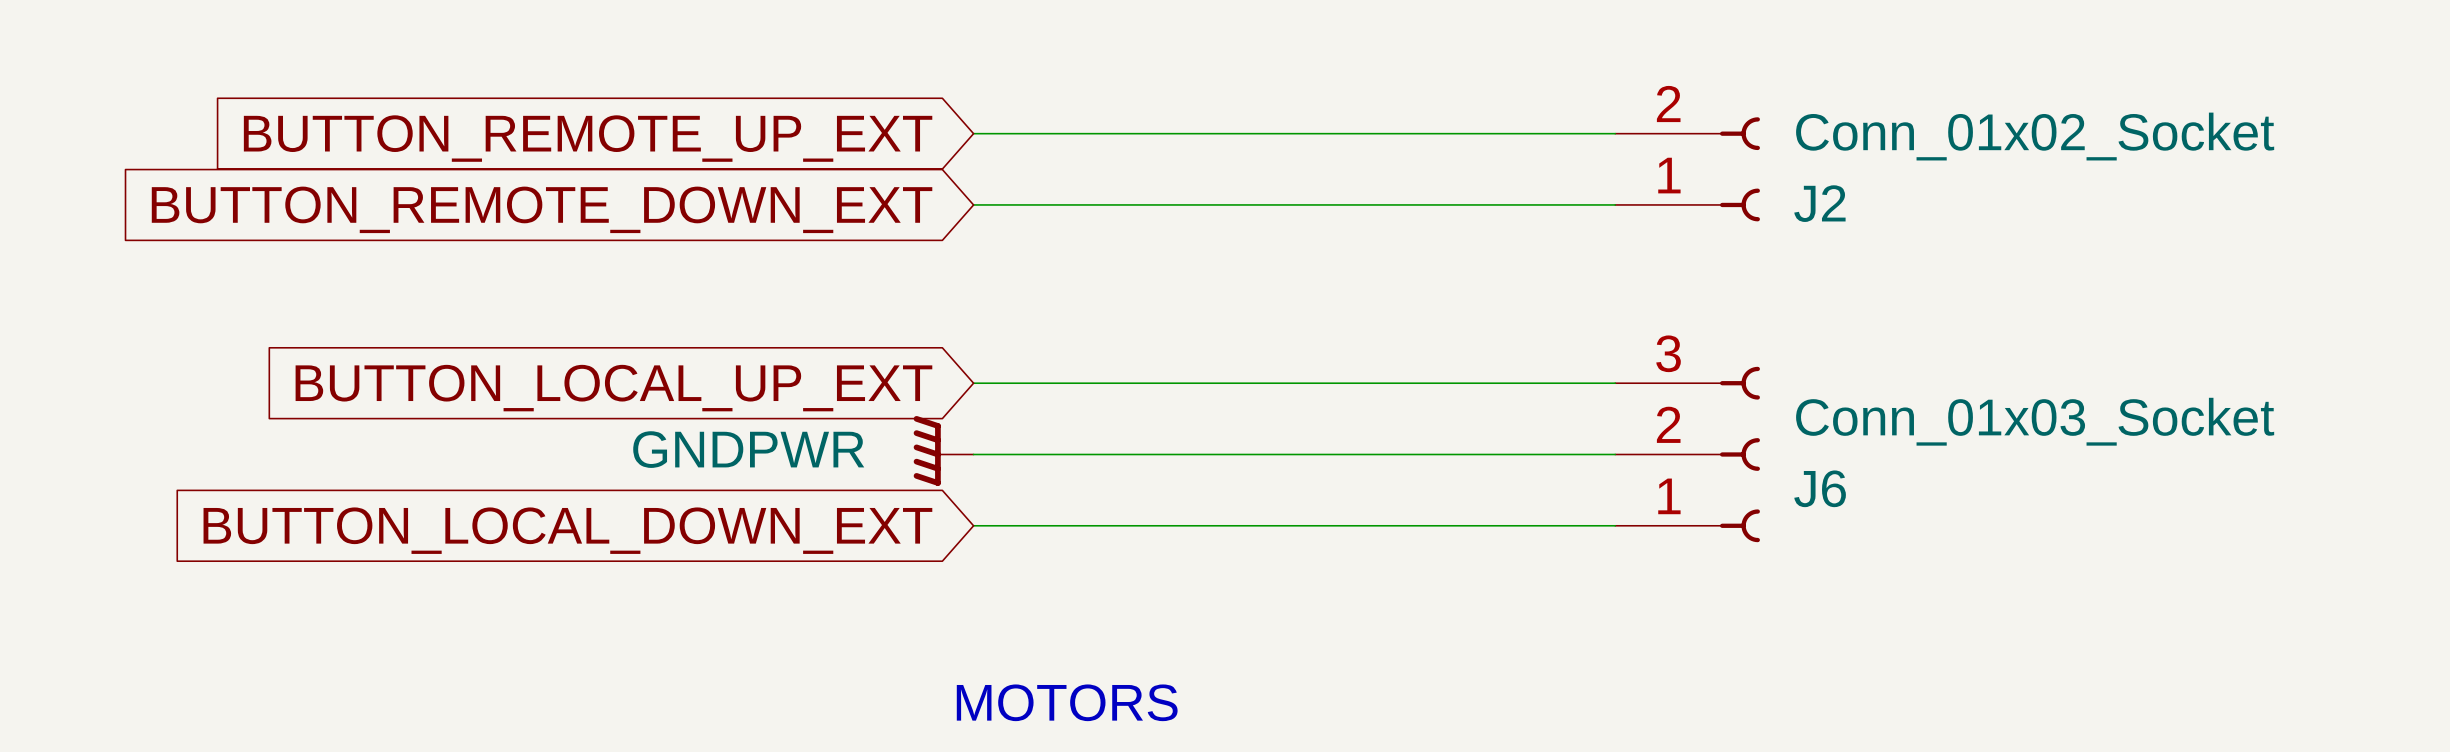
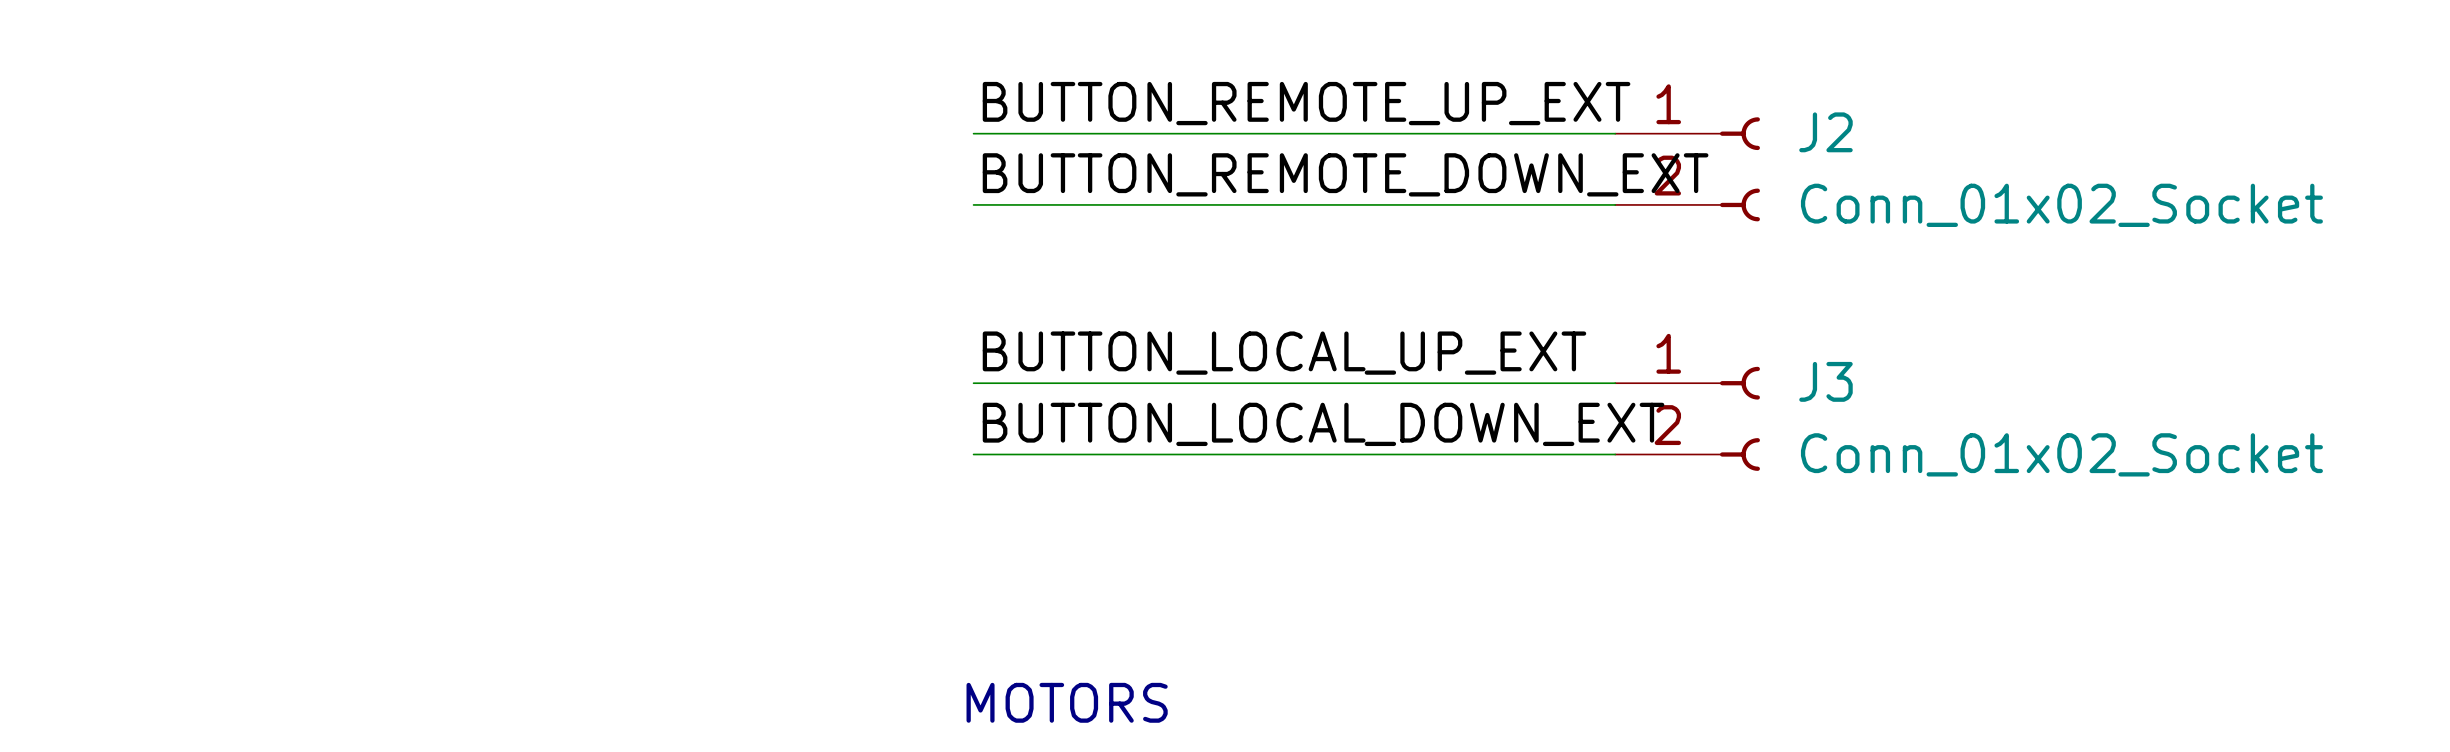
label: none -> BUTTON_REMOTE_UP_EXT (1306, 103)
global label: BUTTON_REMOTE_UP_EXT (588, 138) -> none
J2 flip: as is (1739, 169) -> up-down (1739, 169)
label: none -> BUTTON_REMOTE_DOWN_EXT (1345, 174)
global label: BUTTON_REMOTE_DOWN_EXT (542, 209) -> none
label: none -> BUTTON_LOCAL_UP_EXT (1284, 353)
global label: BUTTON_LOCAL_UP_EXT (613, 388) -> none
J3: none -> Conn_01x02_Socket (1687, 418)
label: none -> BUTTON_LOCAL_DOWN_EXT (1323, 424)
power symbol: GNDPWR (943, 450) -> none
J6: Conn_01x03_Socket (1687, 454) -> none
wire: (973, 525) (1615, 525) -> none
global label: BUTTON_LOCAL_DOWN_EXT (567, 530) -> none

